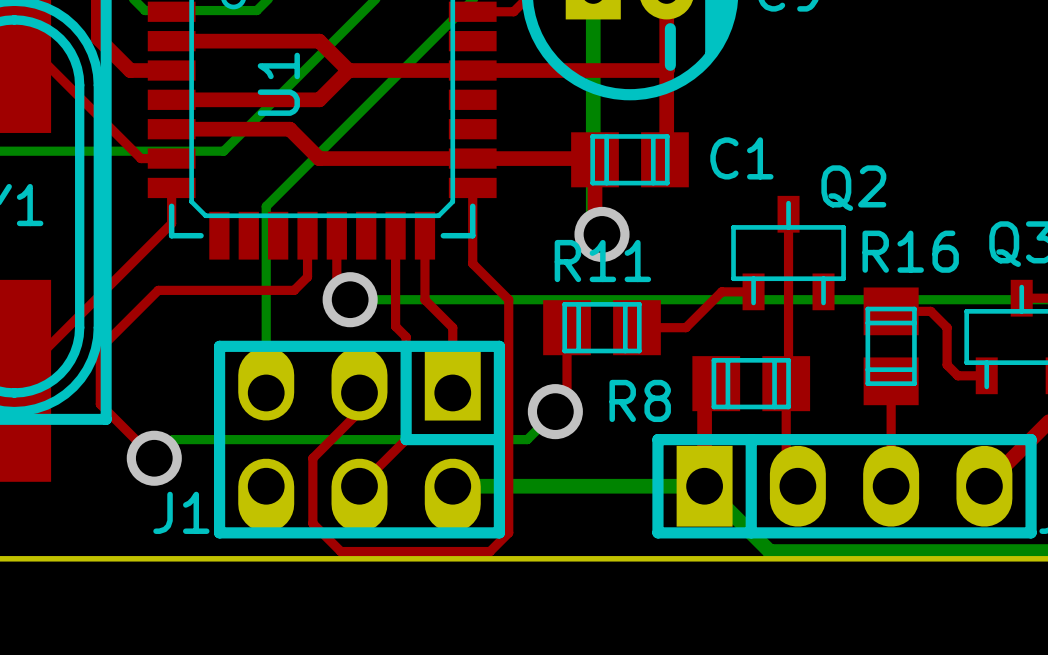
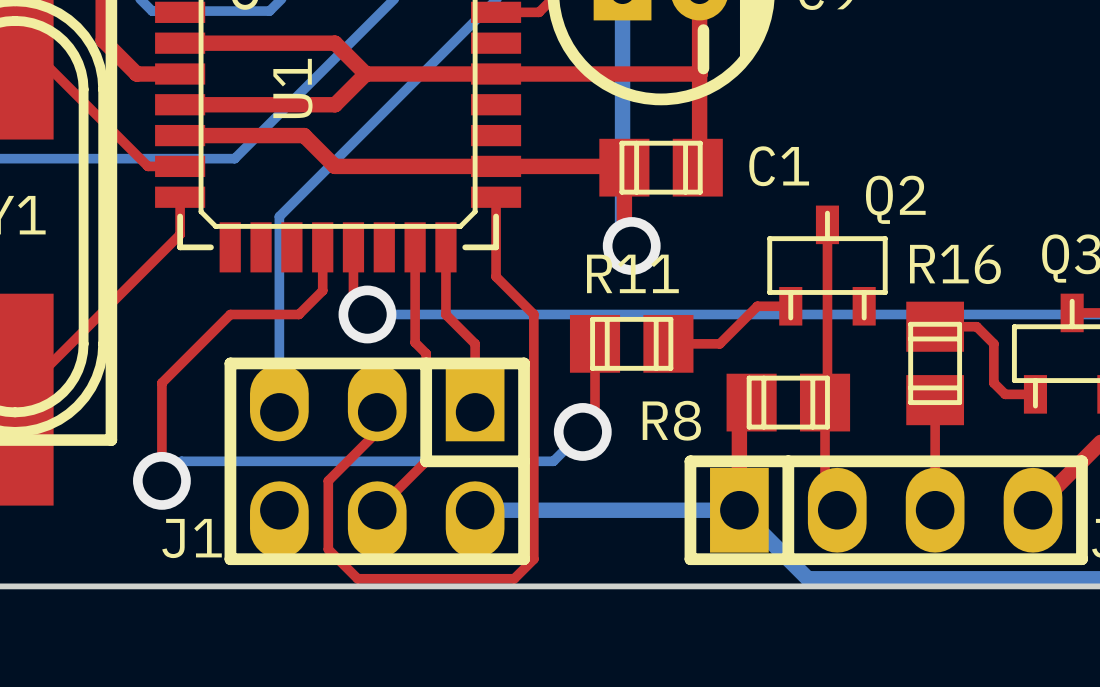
top track: (294, 290) (158, 290) (100, 348) (100, 404) (154, 458) -> (308, 304) (298, 314) (230, 314) (161, 383) (161, 480)

